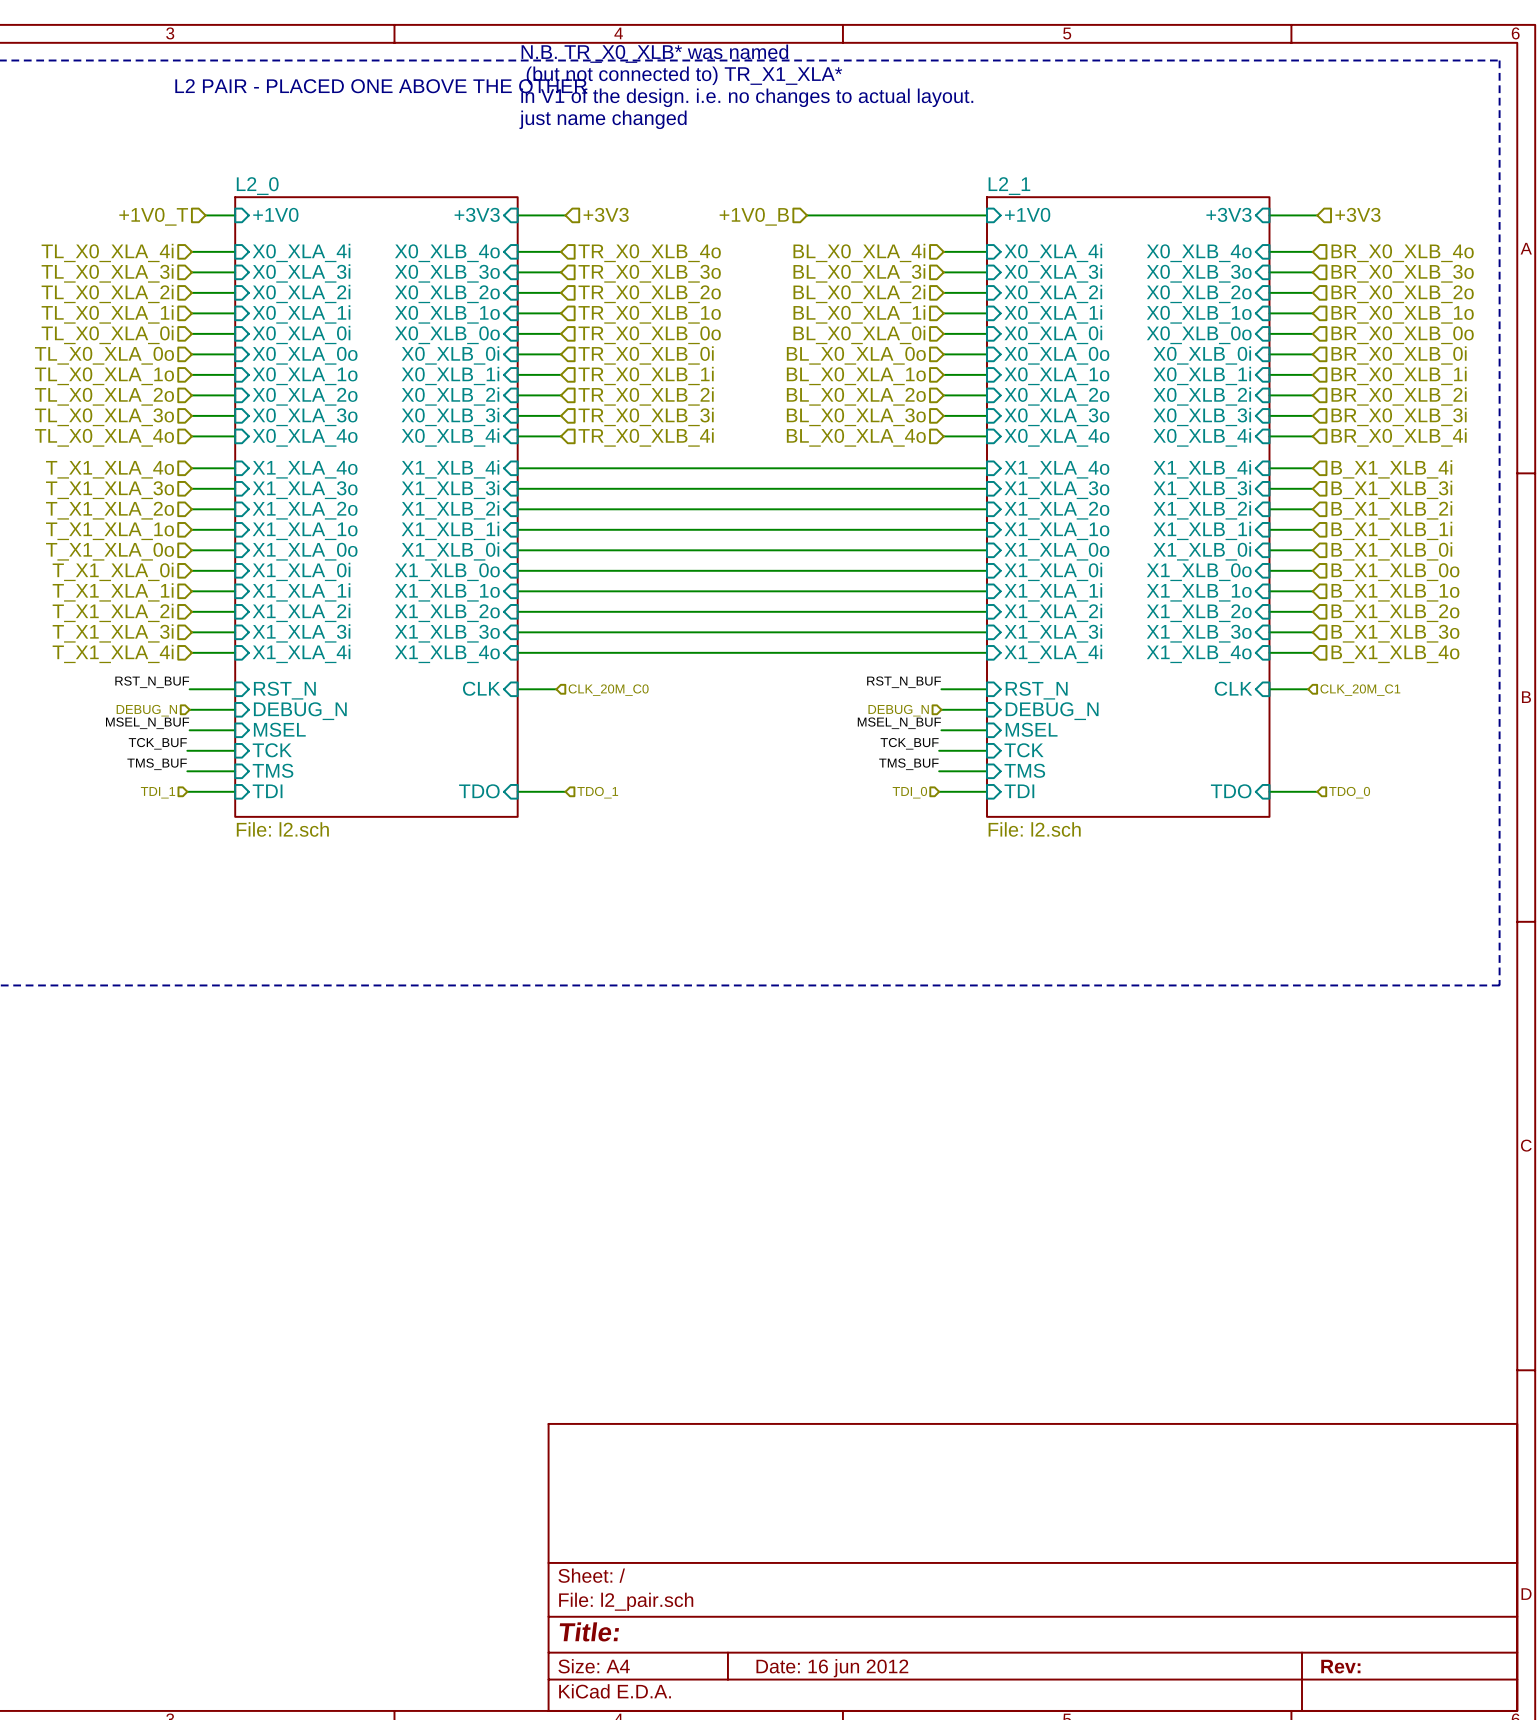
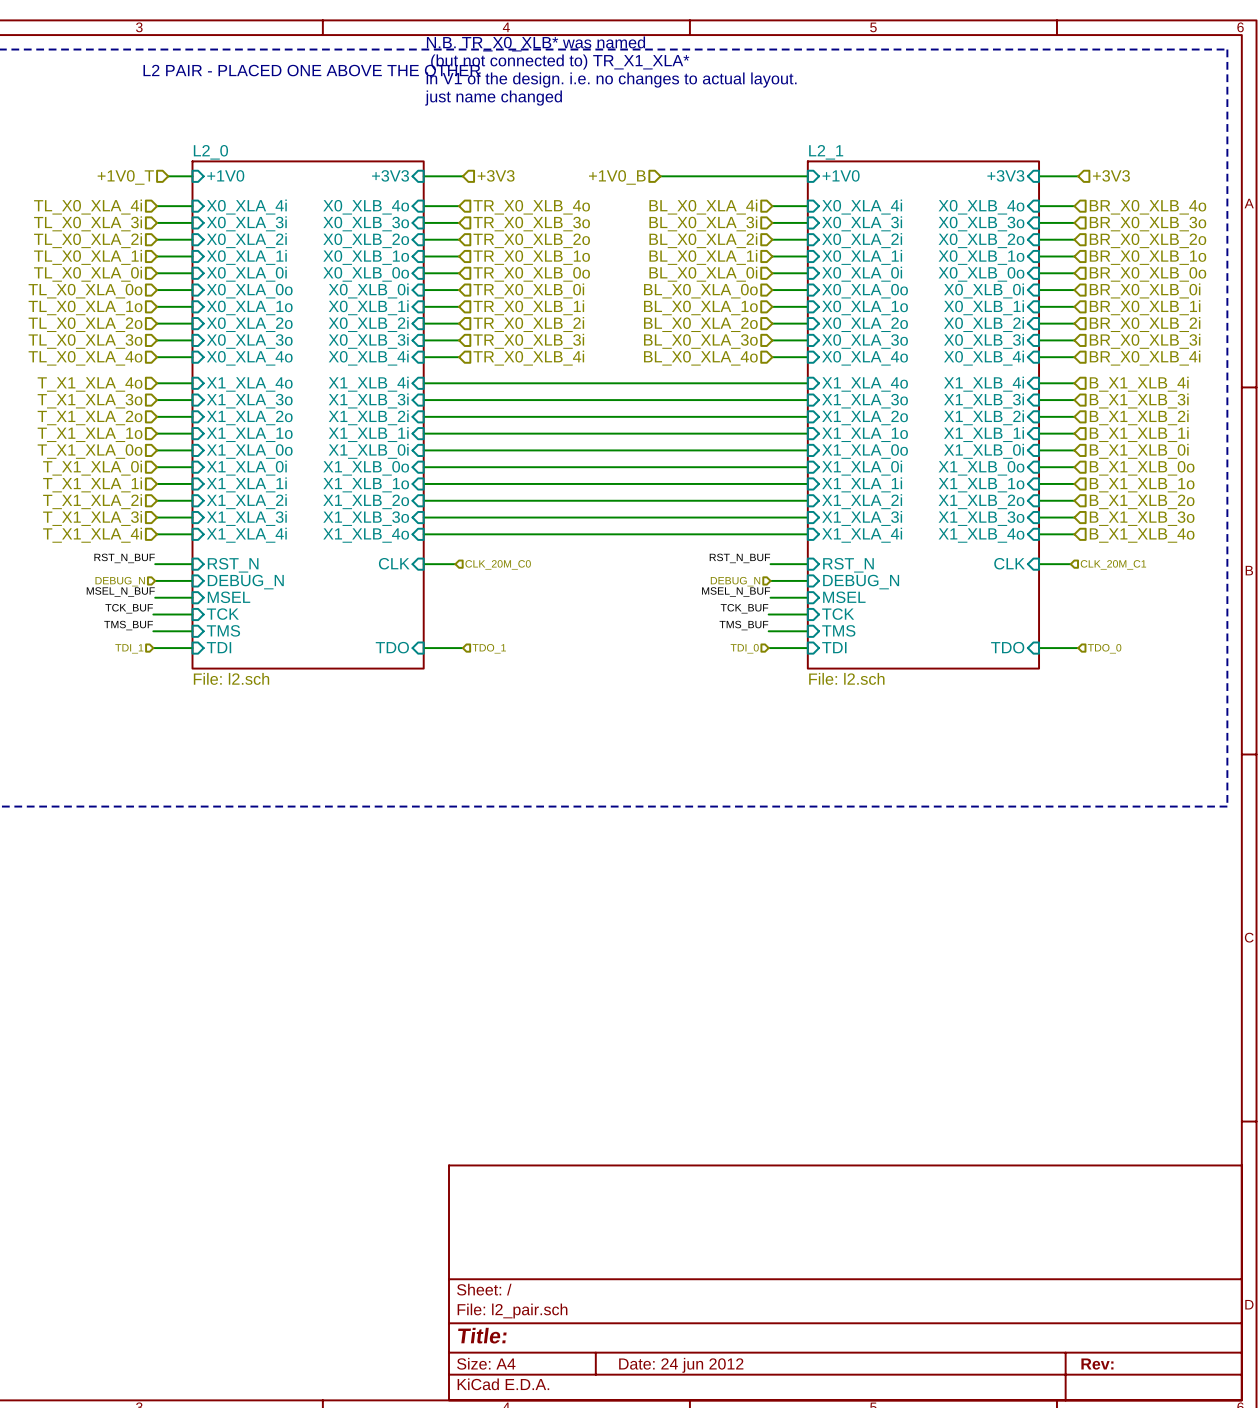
title block: Date: 16 jun 2012 (832, 1668) -> Date: 24 jun 2012 (681, 1365)

